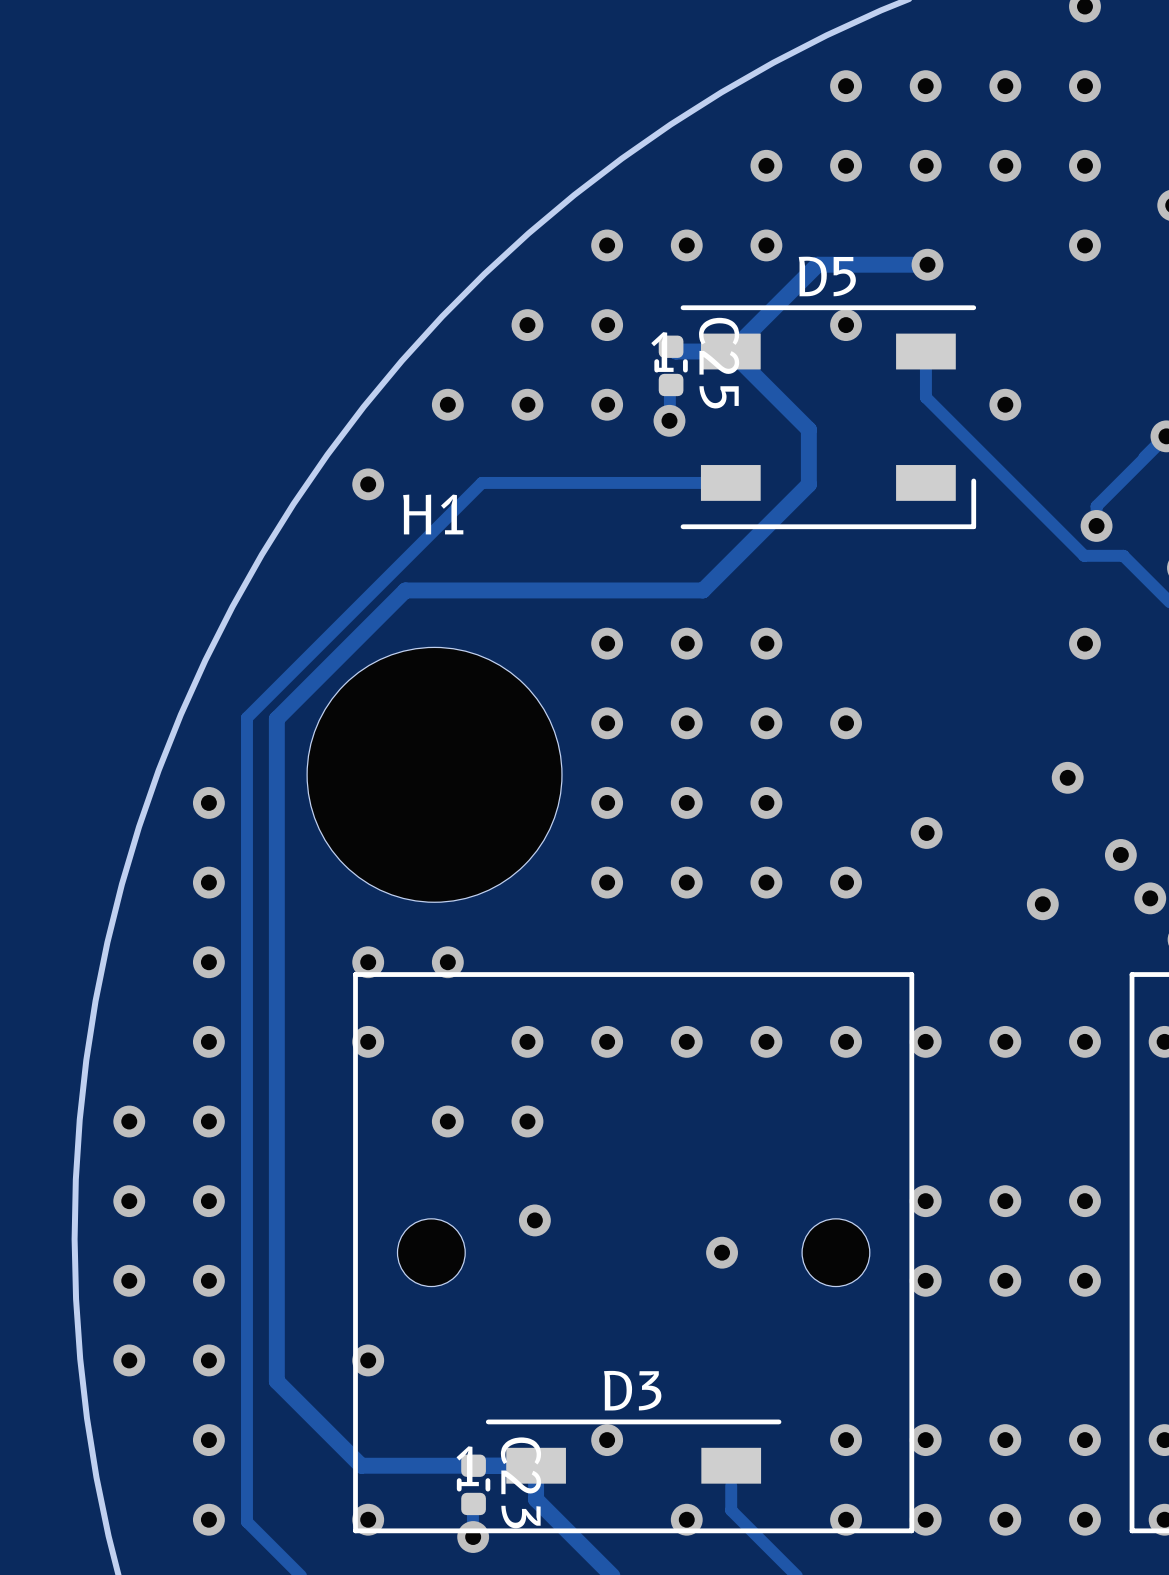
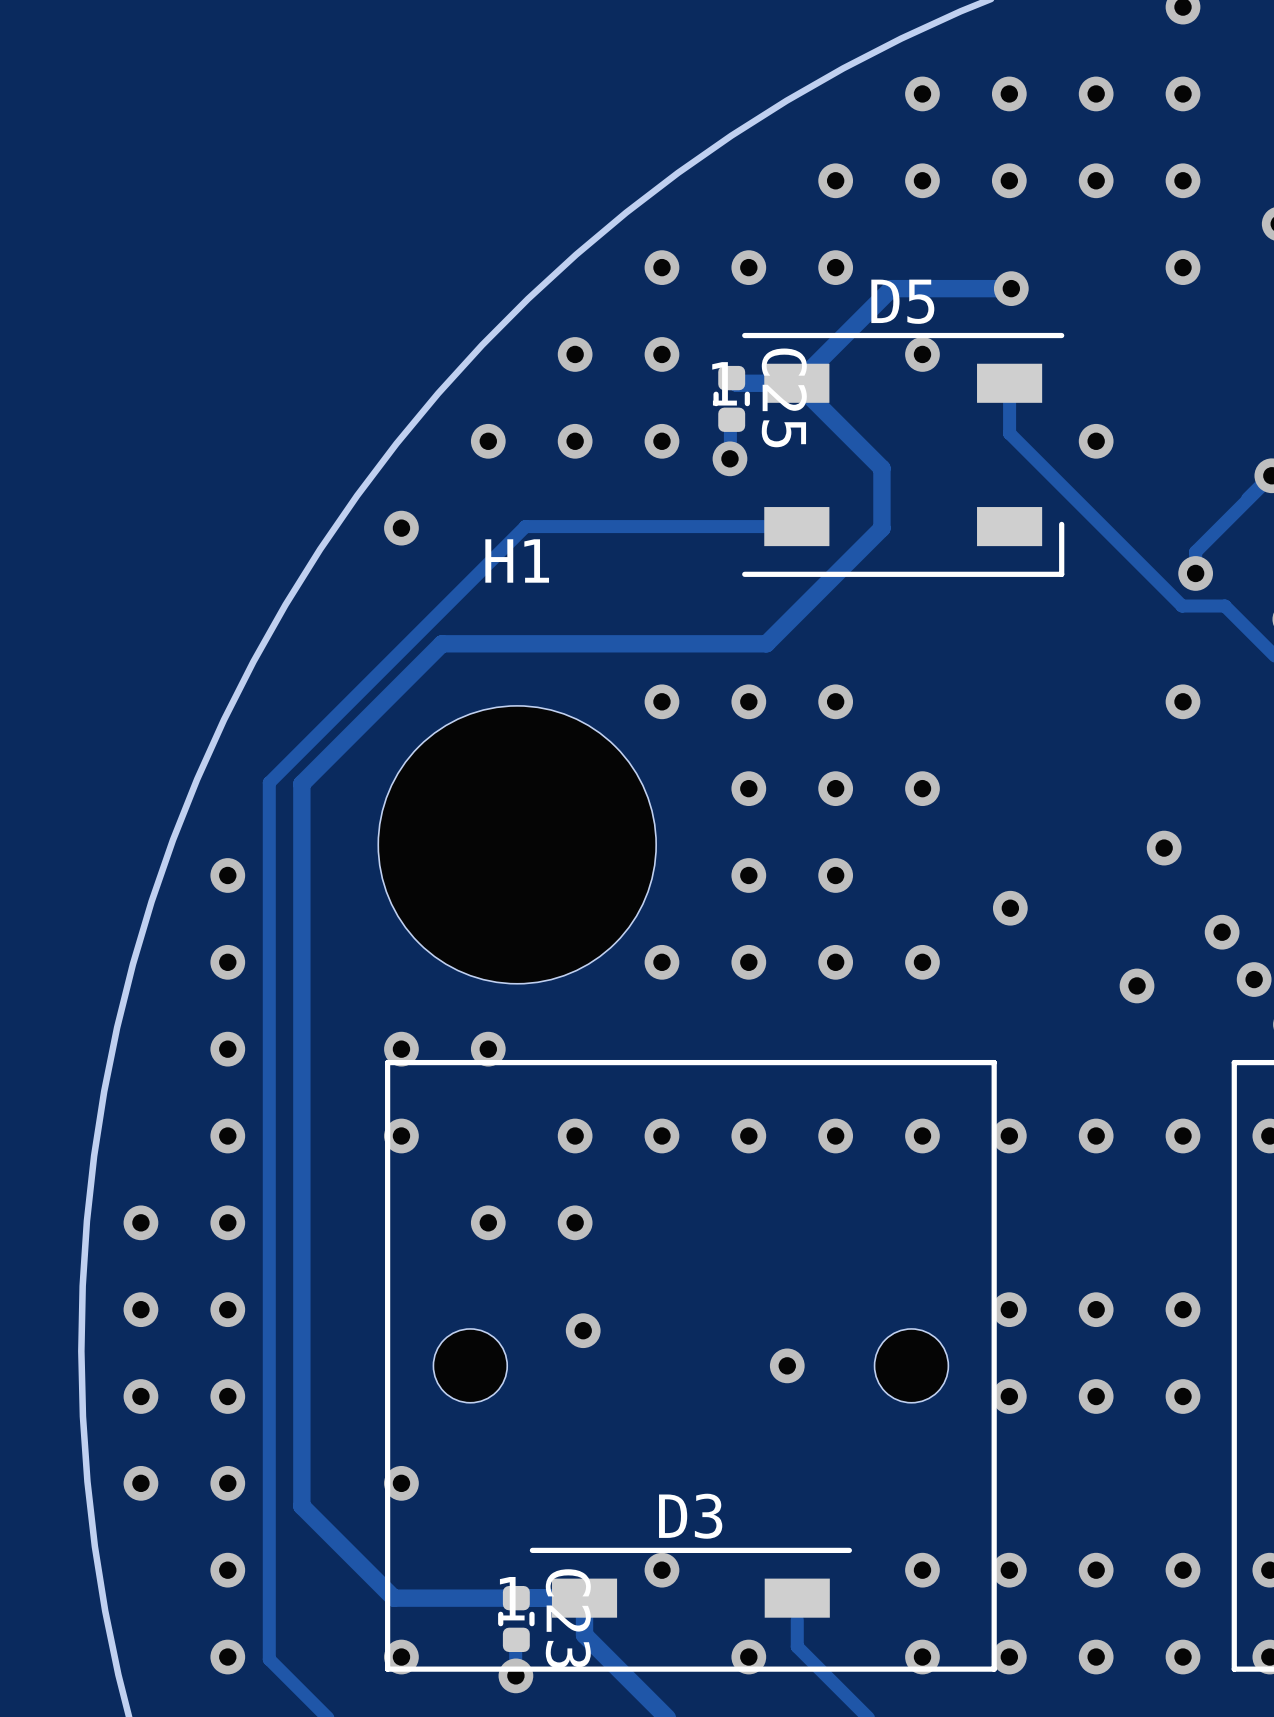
via: (607, 723) -> none
H1 position: (434, 774) -> (517, 844)
via: (607, 802) -> none

